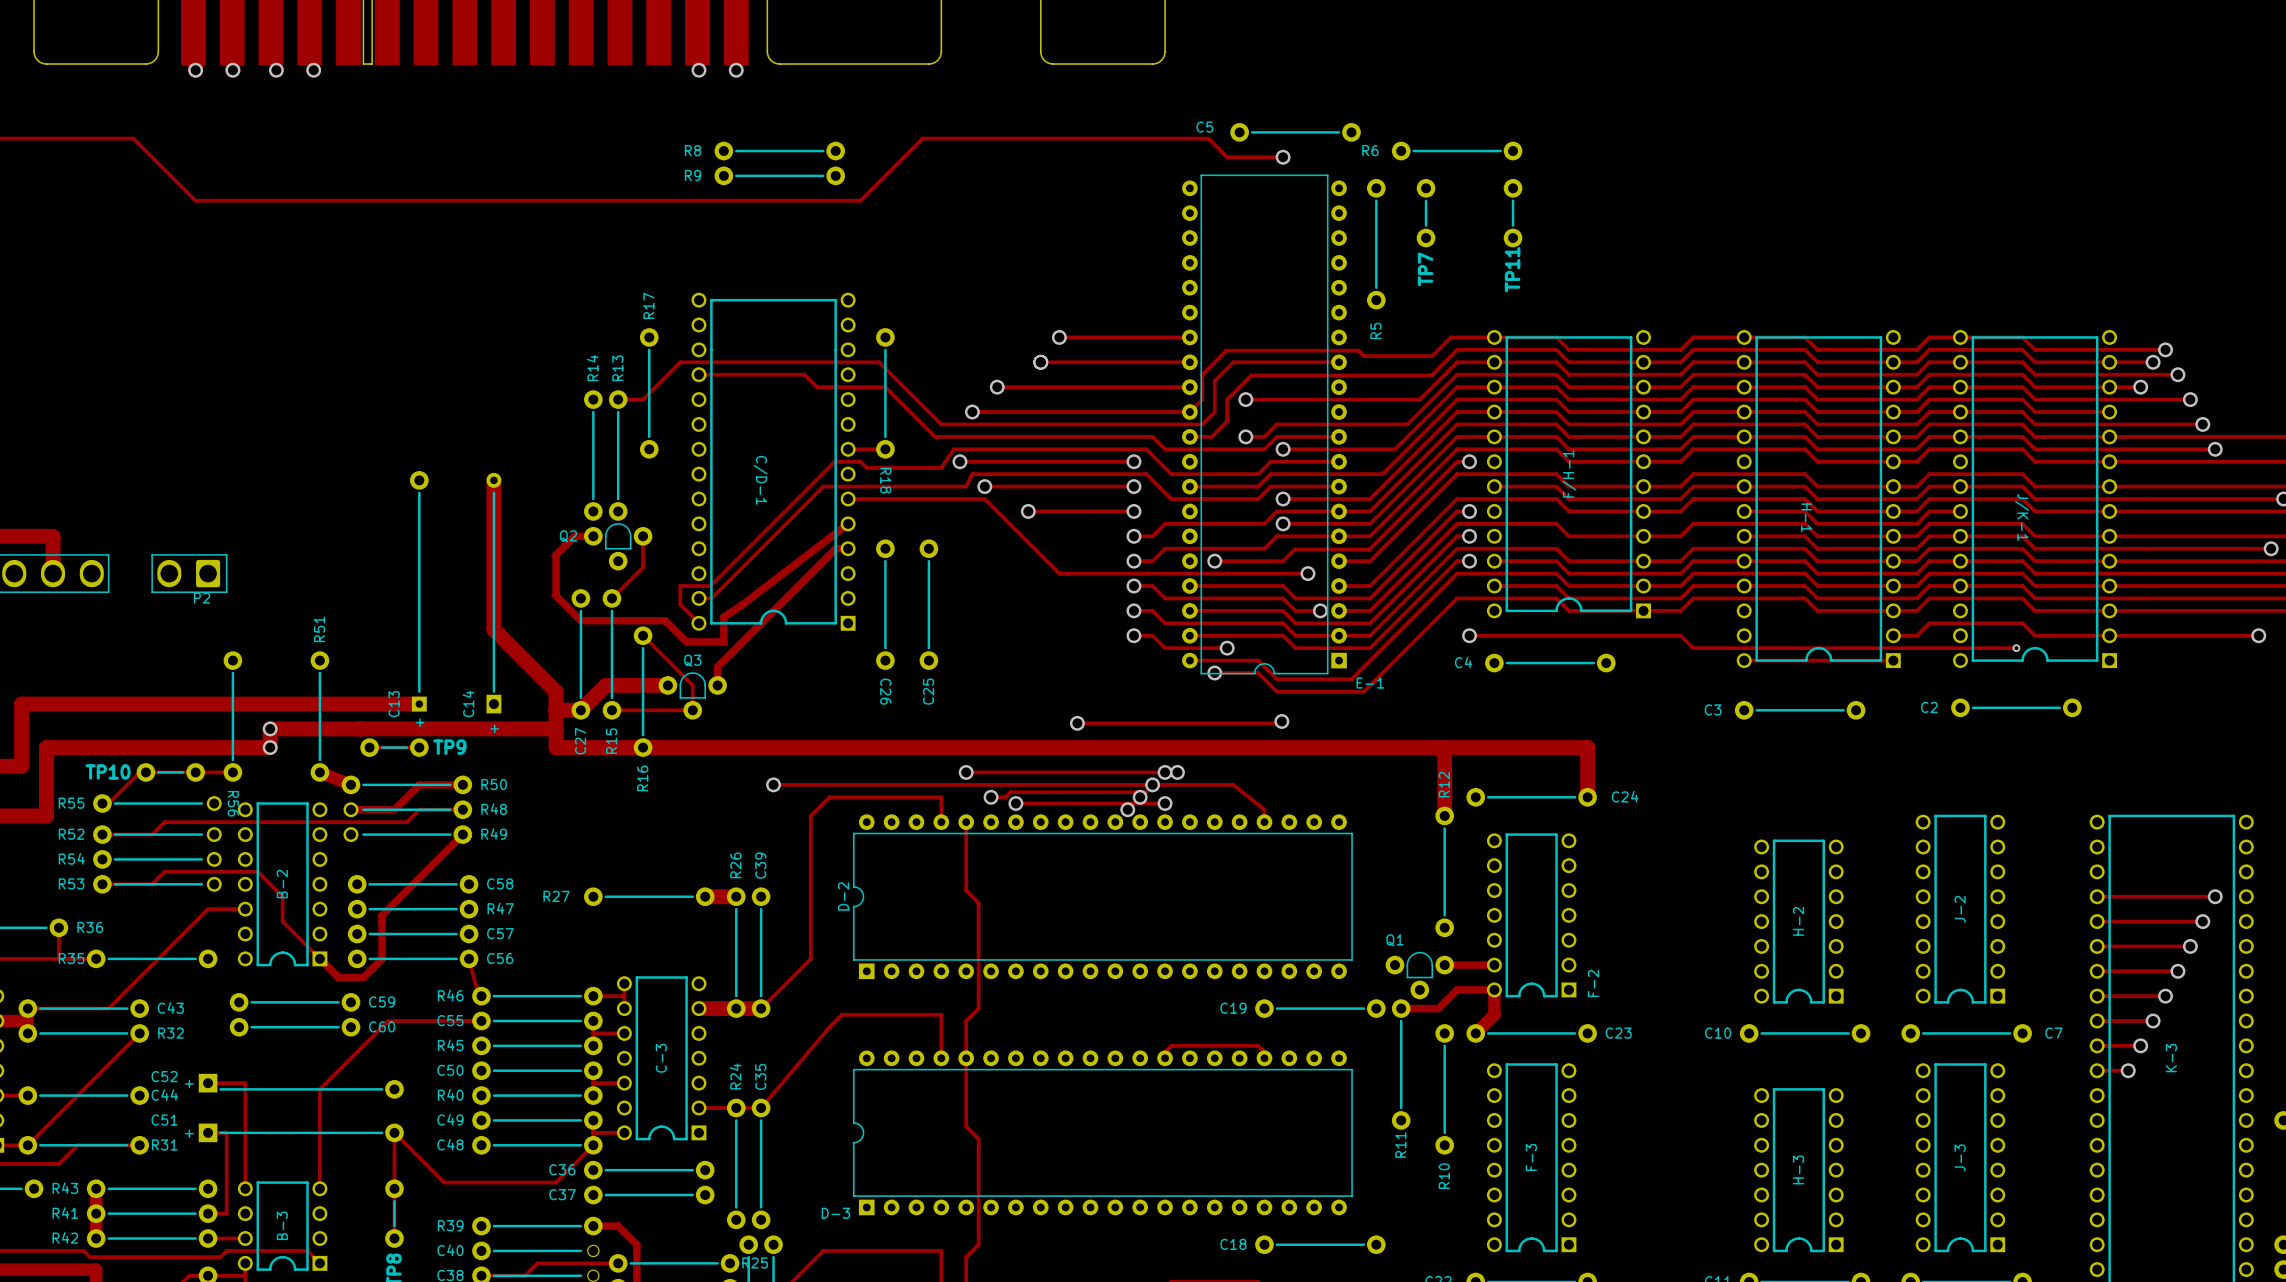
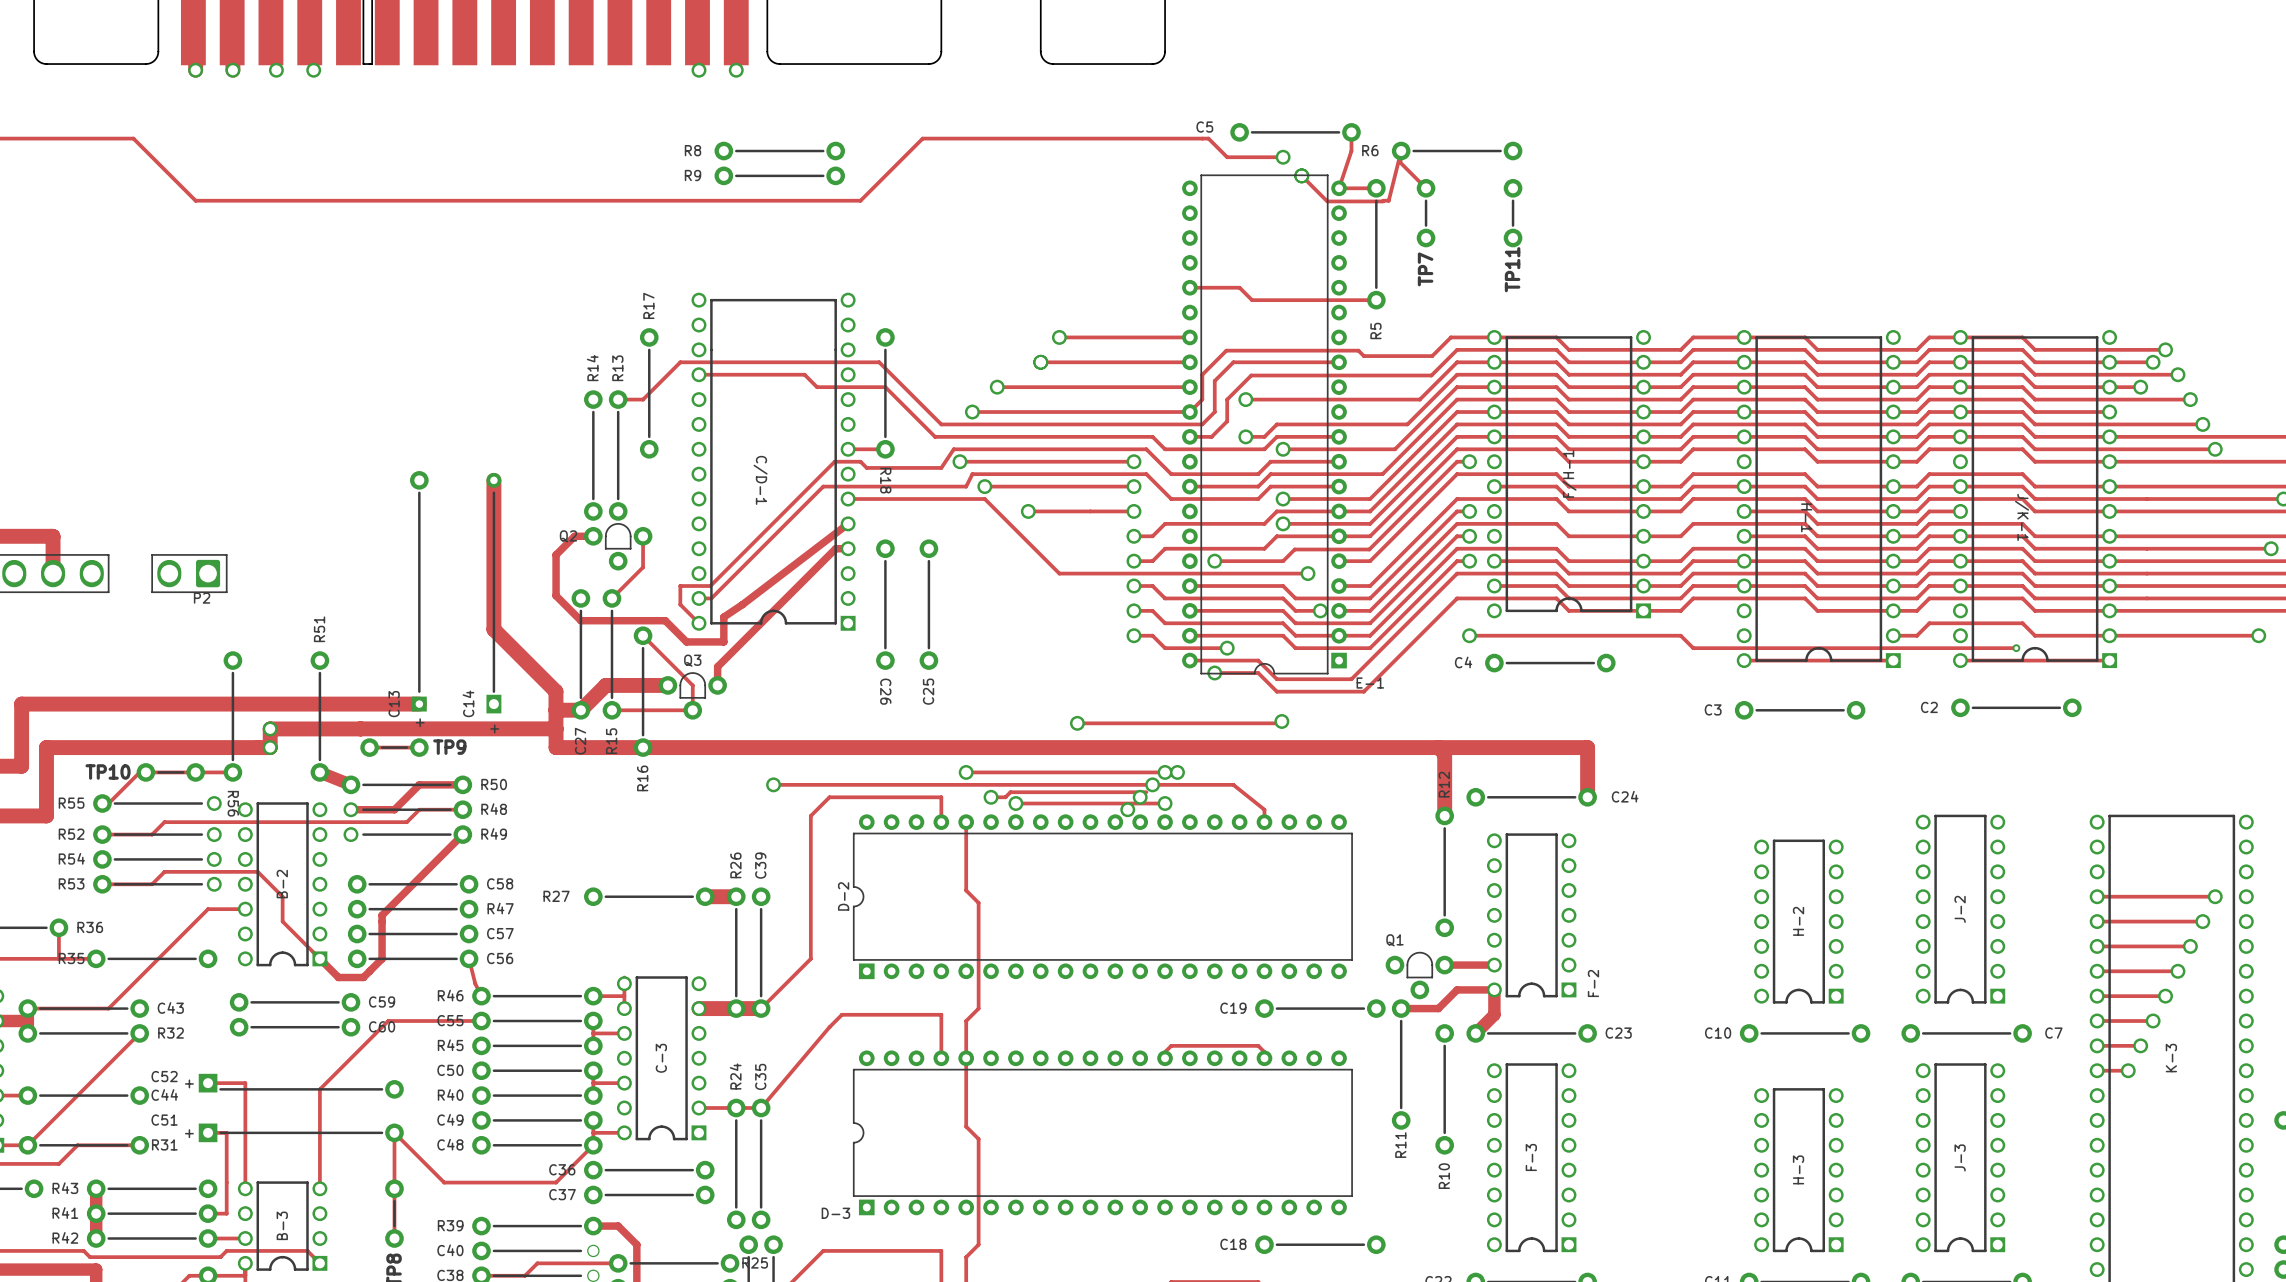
track: none -> (1351, 132) (1351, 151) (1339, 188) (1376, 188)
track: none -> (1301, 175) (1326, 200)
via: none -> (1301, 175)
track: none -> (1426, 188) (1401, 163) (1401, 151) (1388, 200) (1327, 201)
track: none -> (1189, 287) (1239, 287) (1252, 300) (1376, 300)
track: none -> (1960, 660) (2109, 660)

